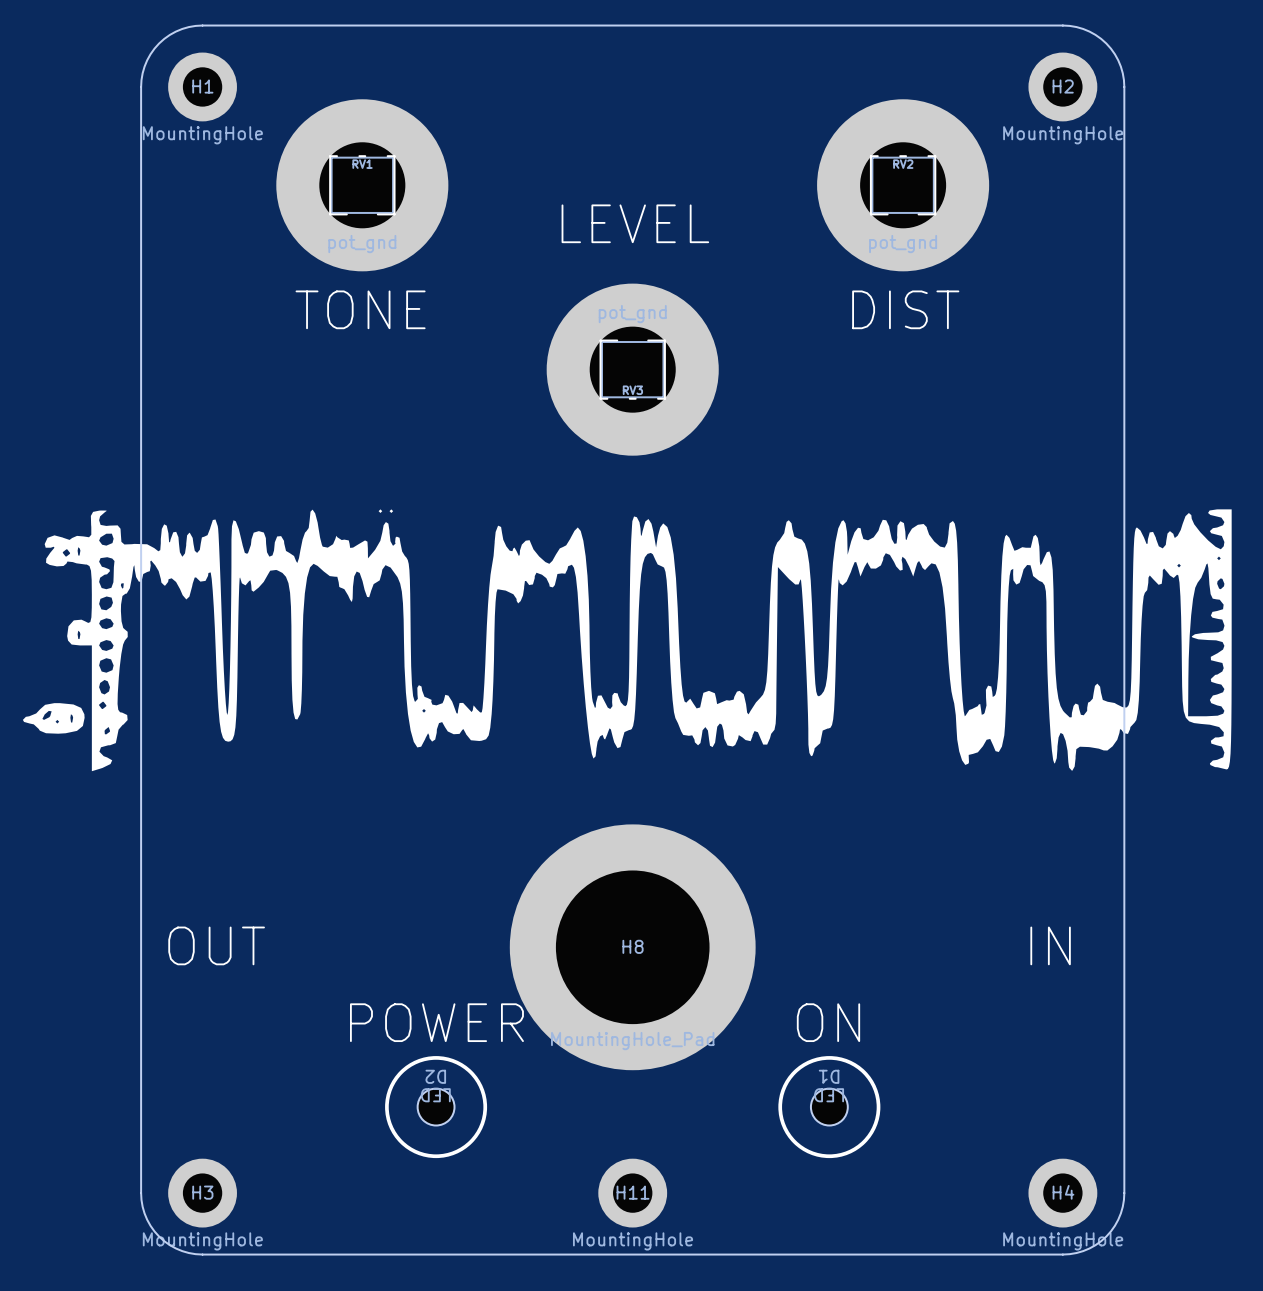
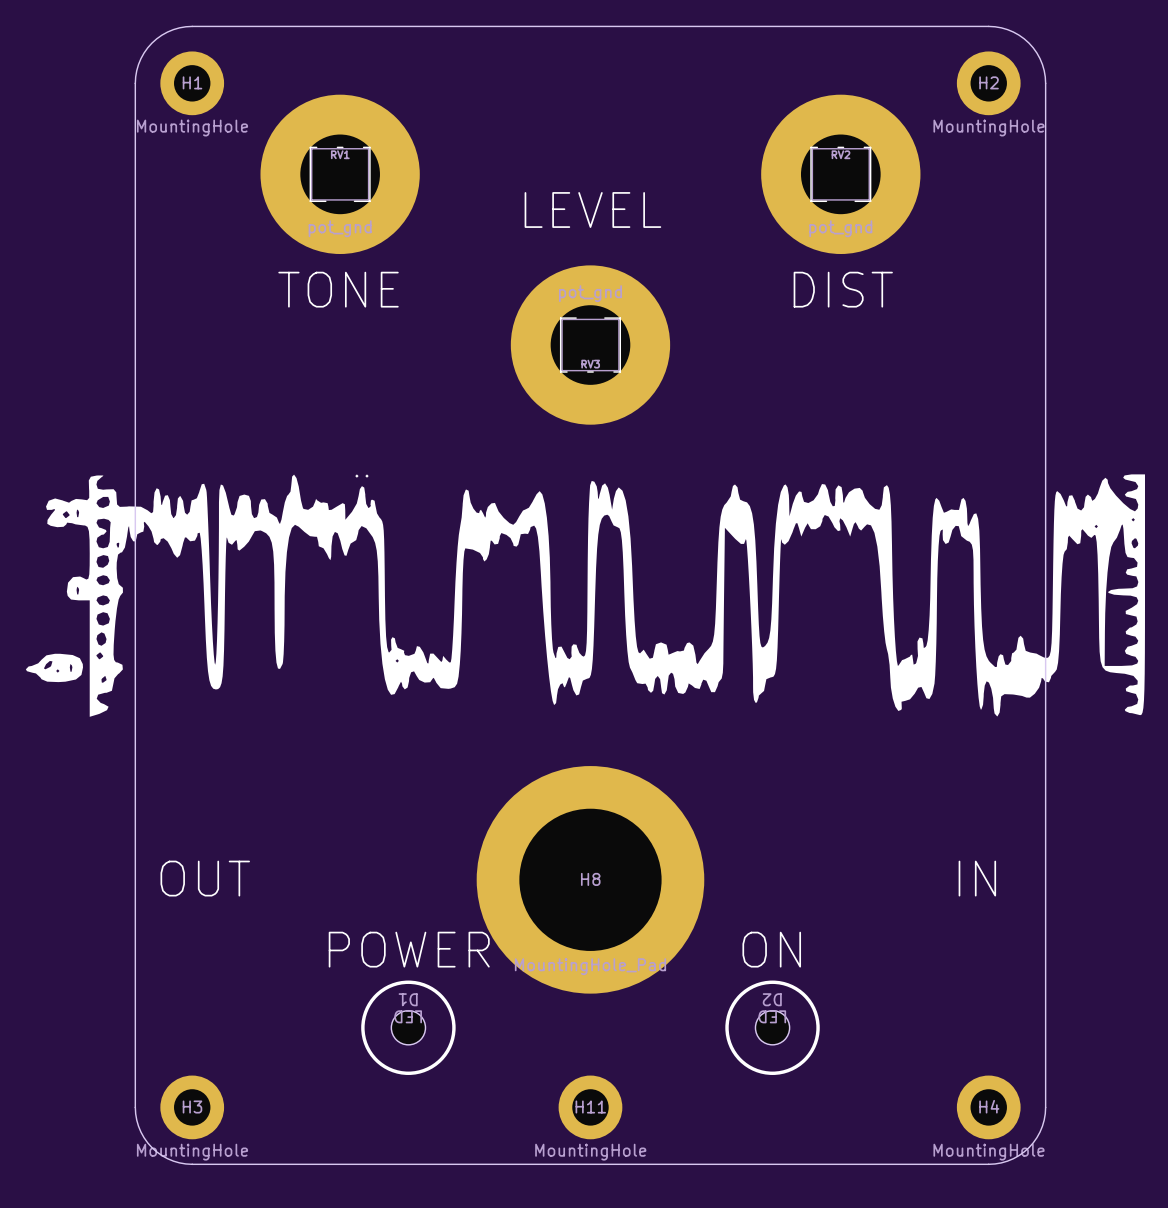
D2 name: D2 (435, 1076) -> D1 (408, 999)
D1 name: D1 (829, 1076) -> D2 (772, 999)

